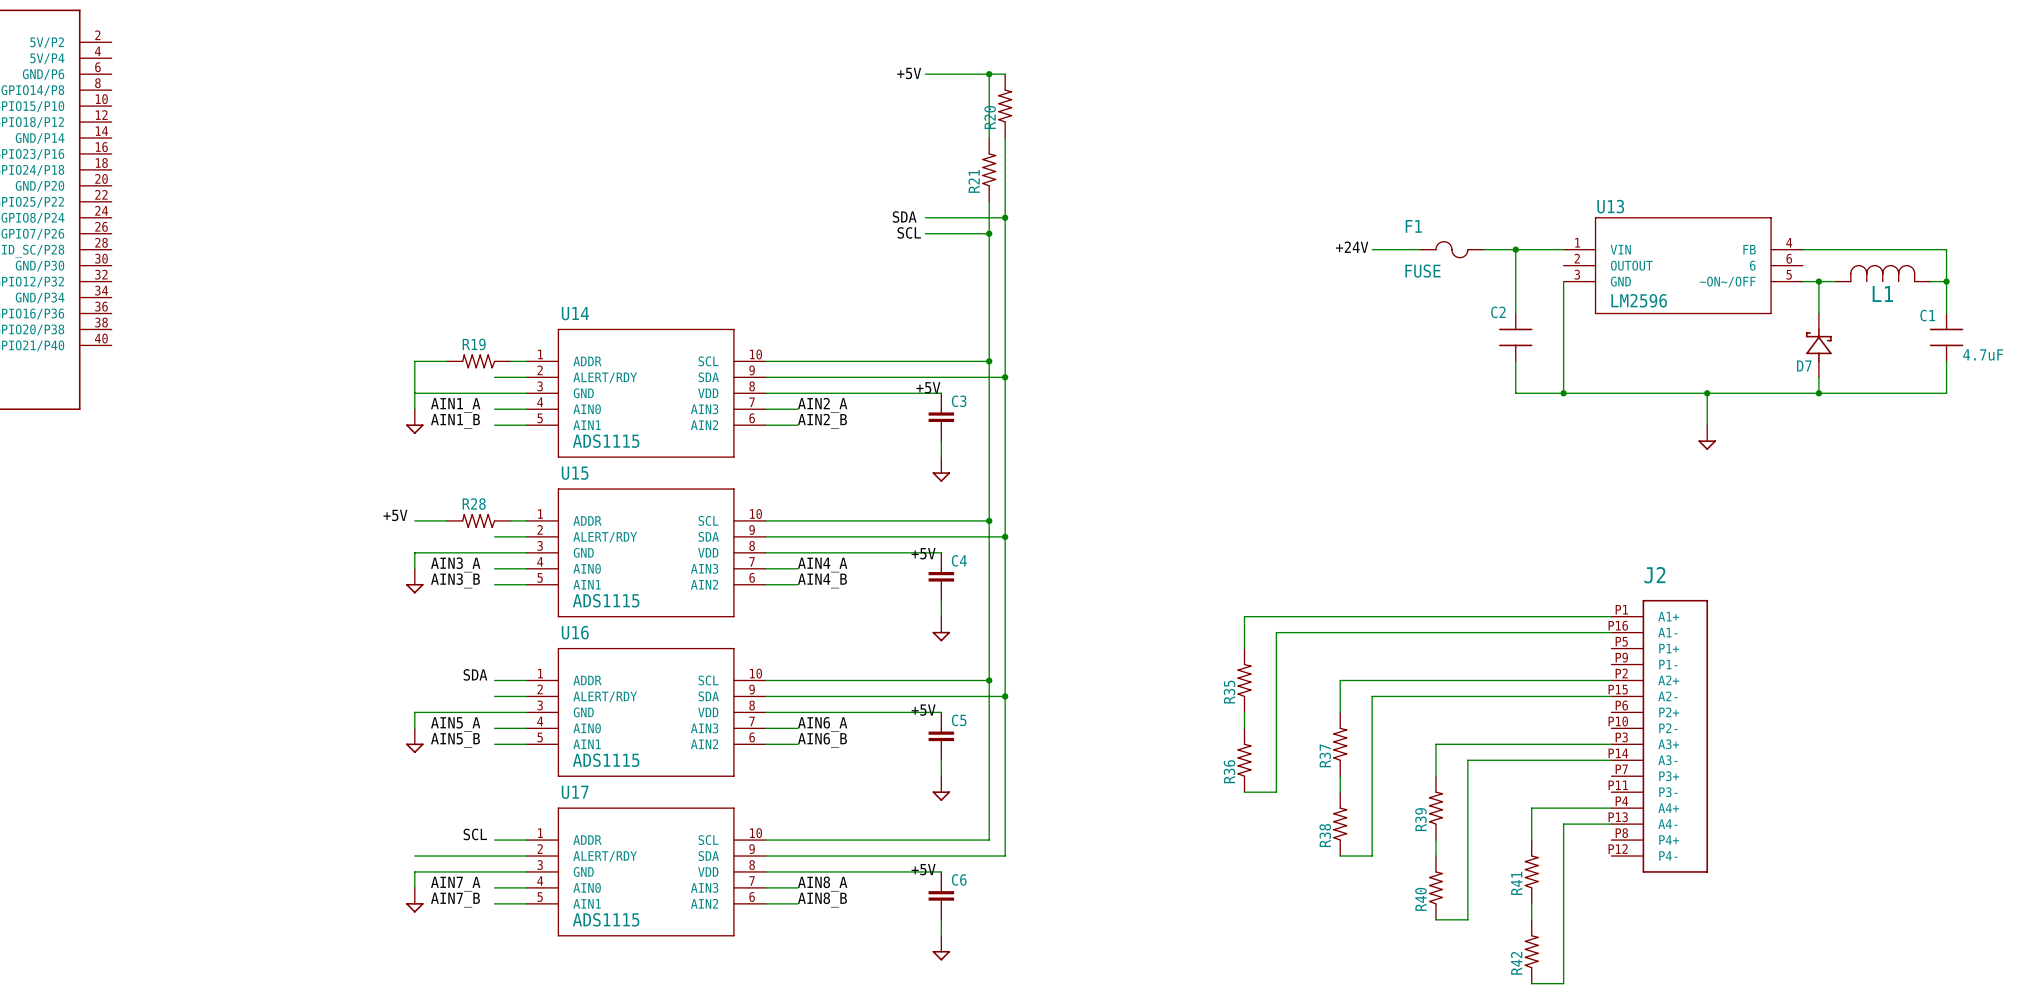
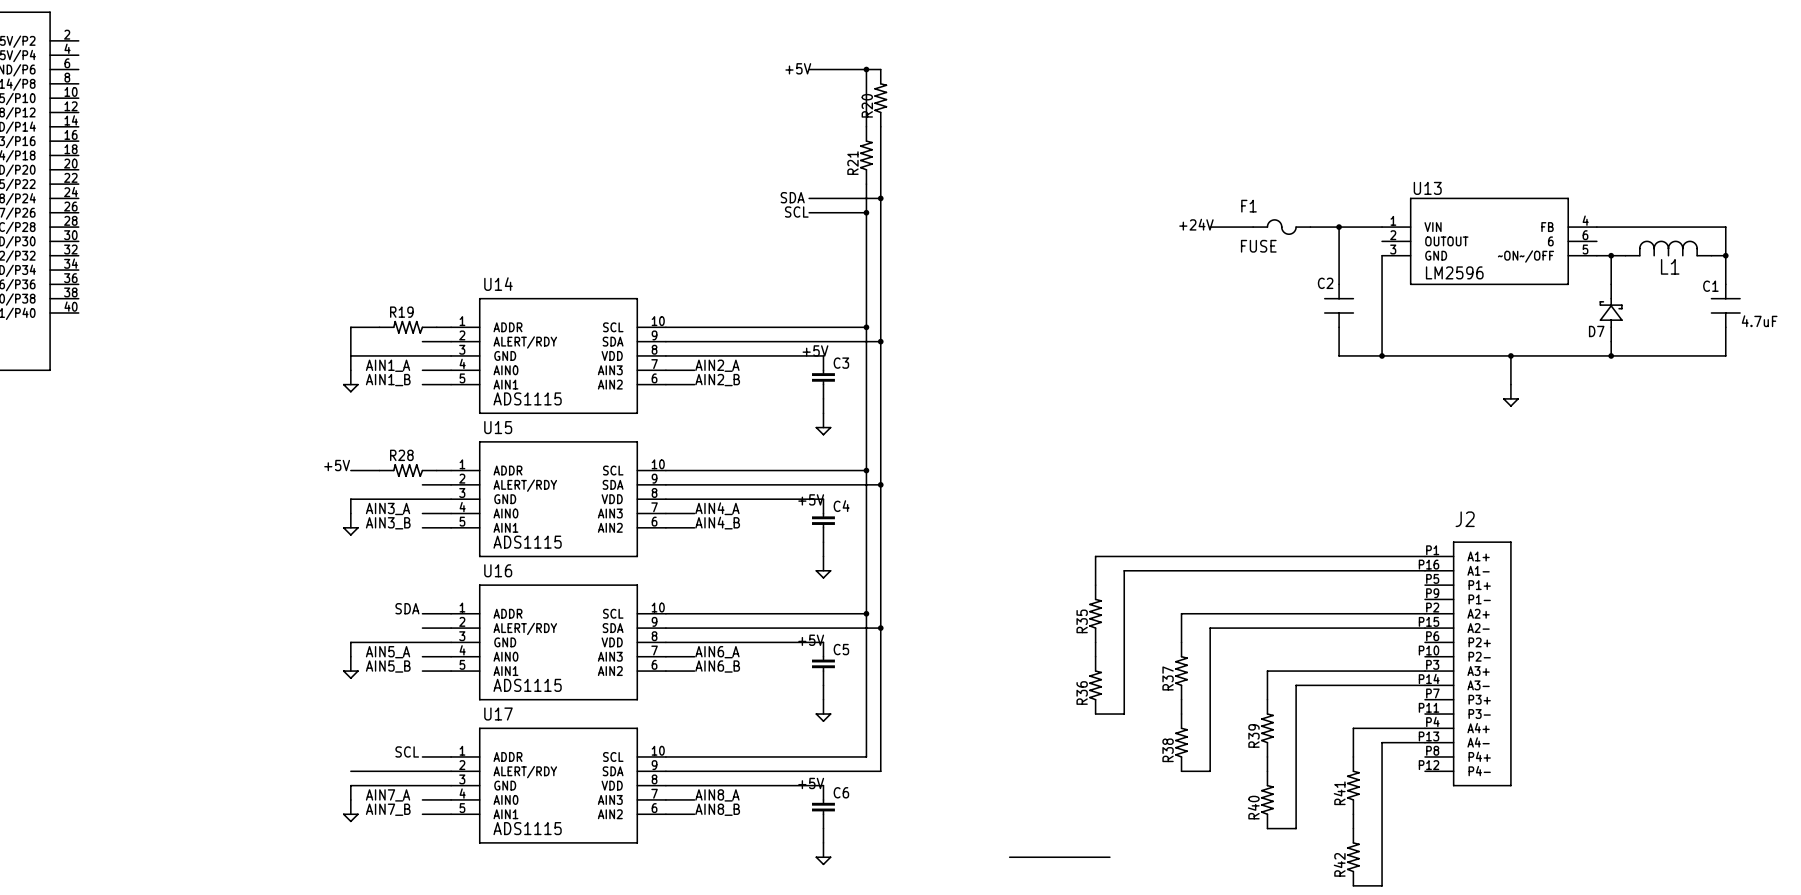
wire: none -> (1009, 857) (1109, 857)

